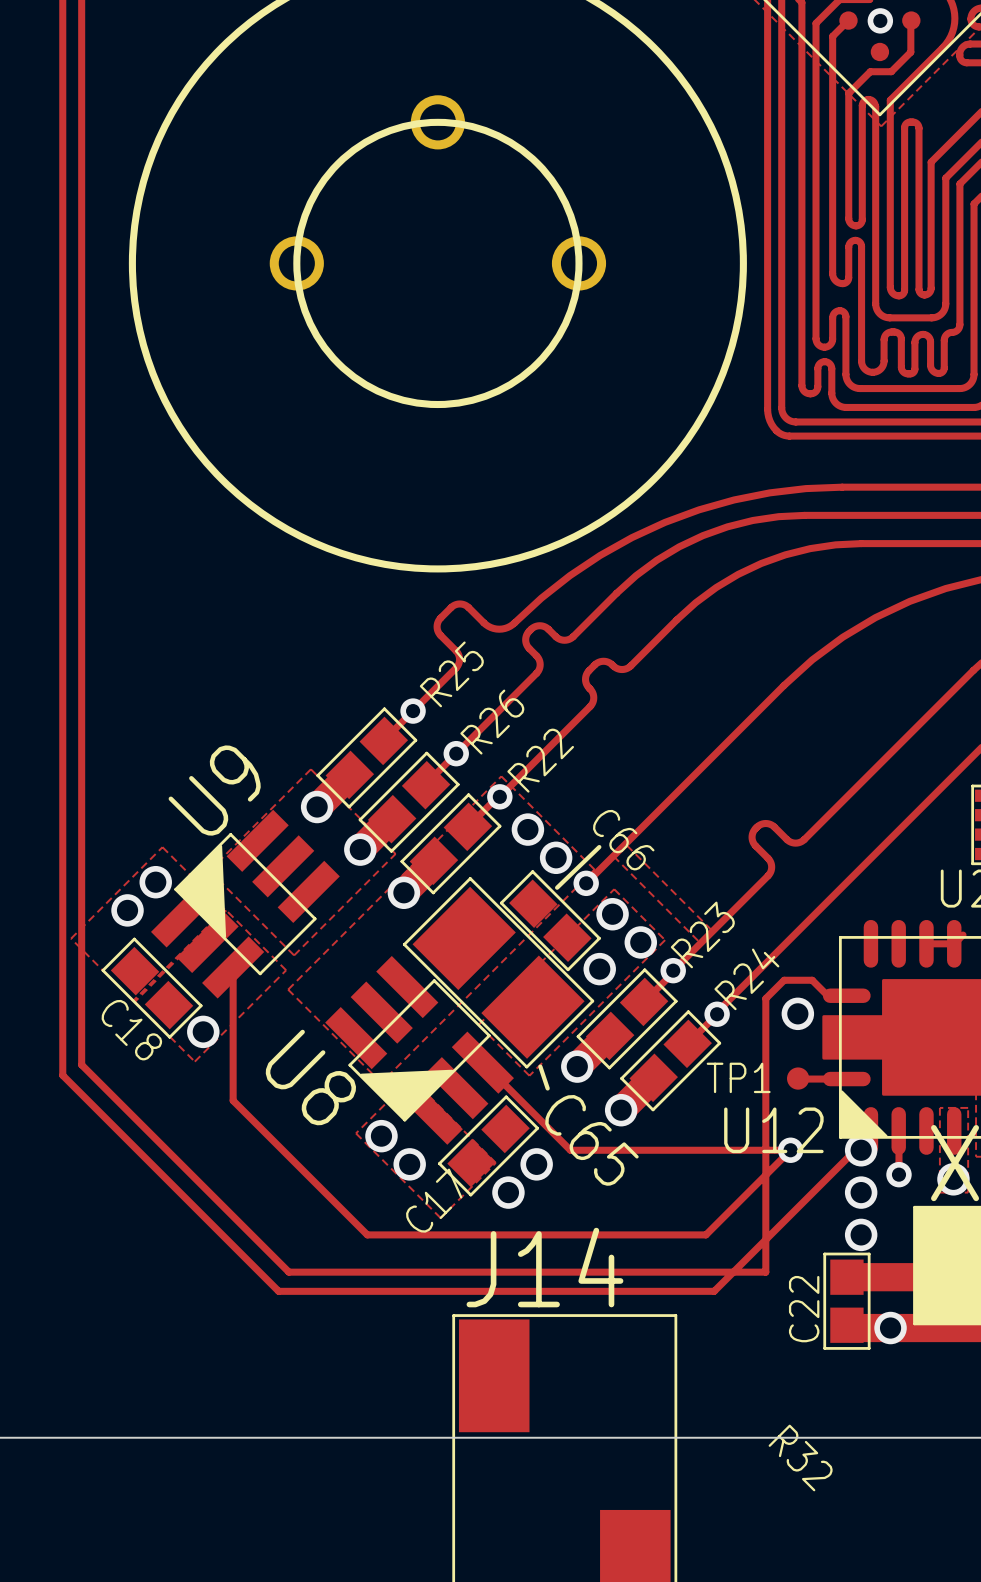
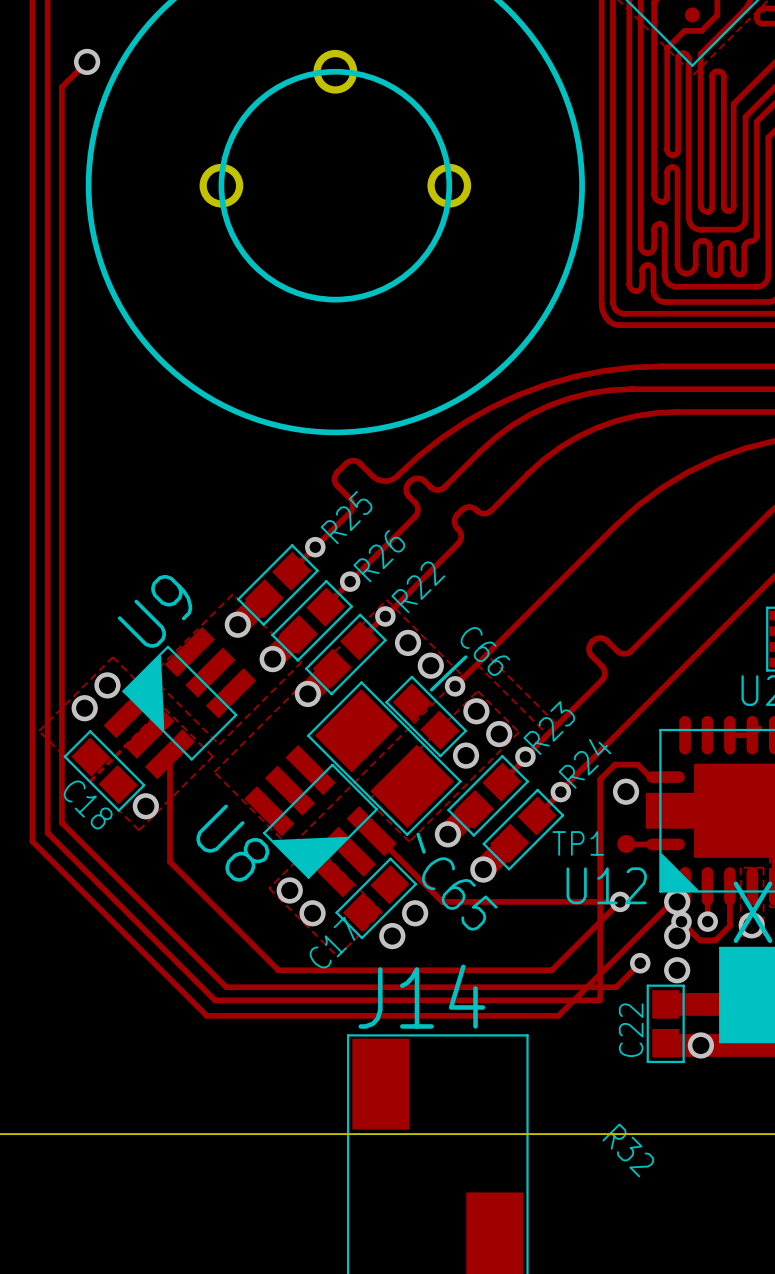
track: none -> (87, 61) (61, 87) (61, 822) (226, 987) (616, 987) (640, 963)
via: none -> (87, 61)
track: none -> (729, 886) (729, 926) (715, 940) (699, 940) (688, 929)
via: none -> (681, 921)
via: none -> (640, 963)

